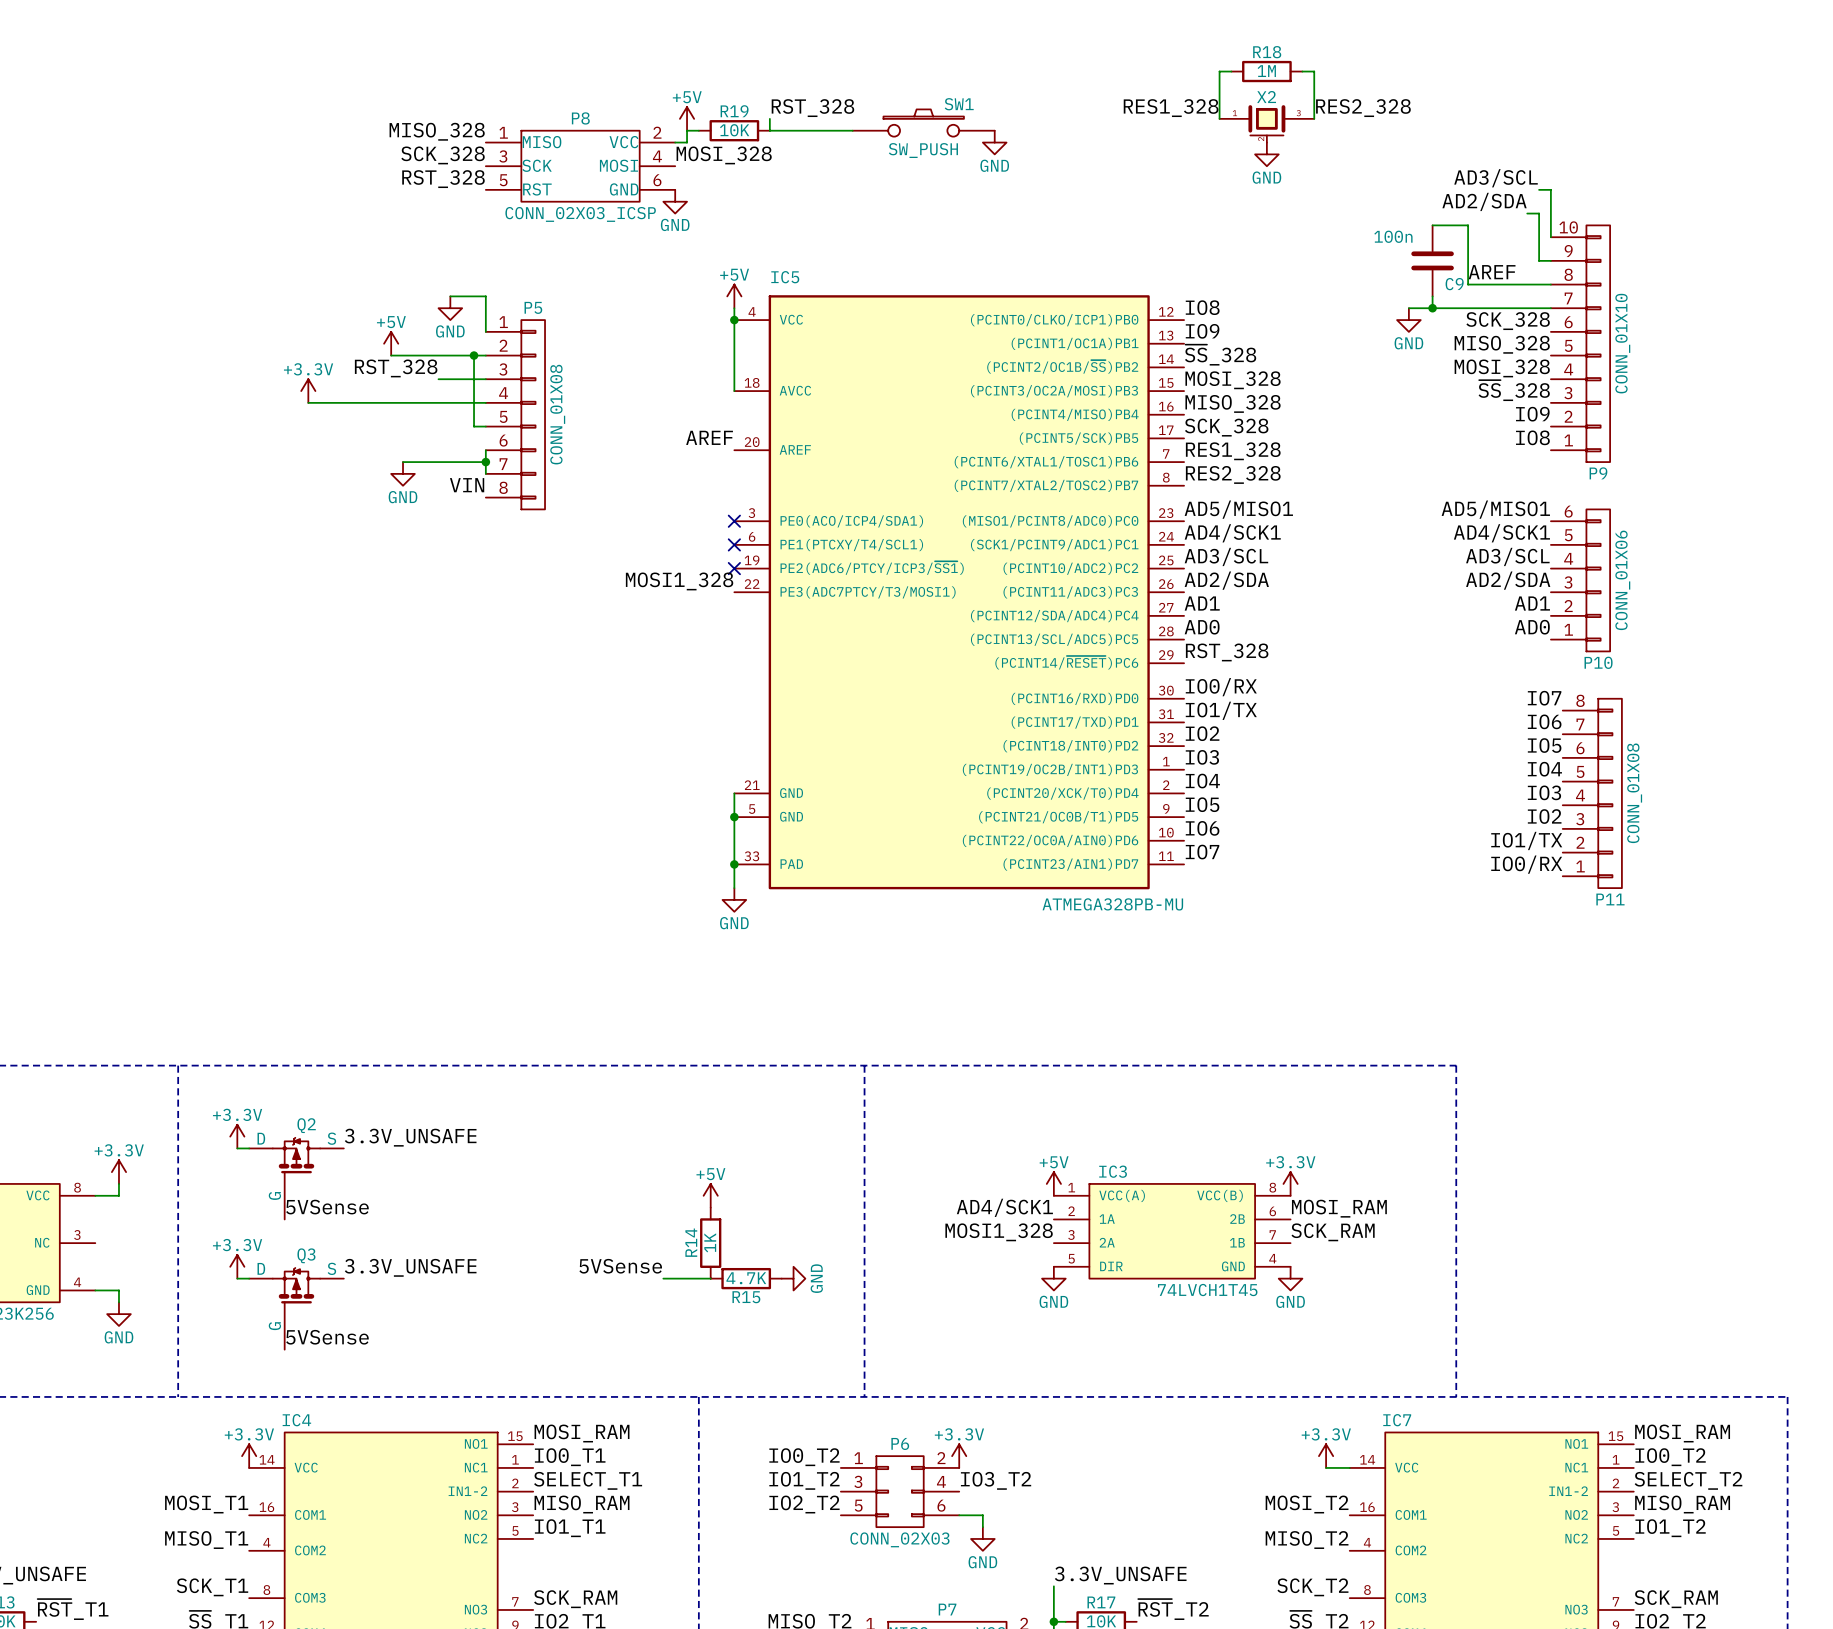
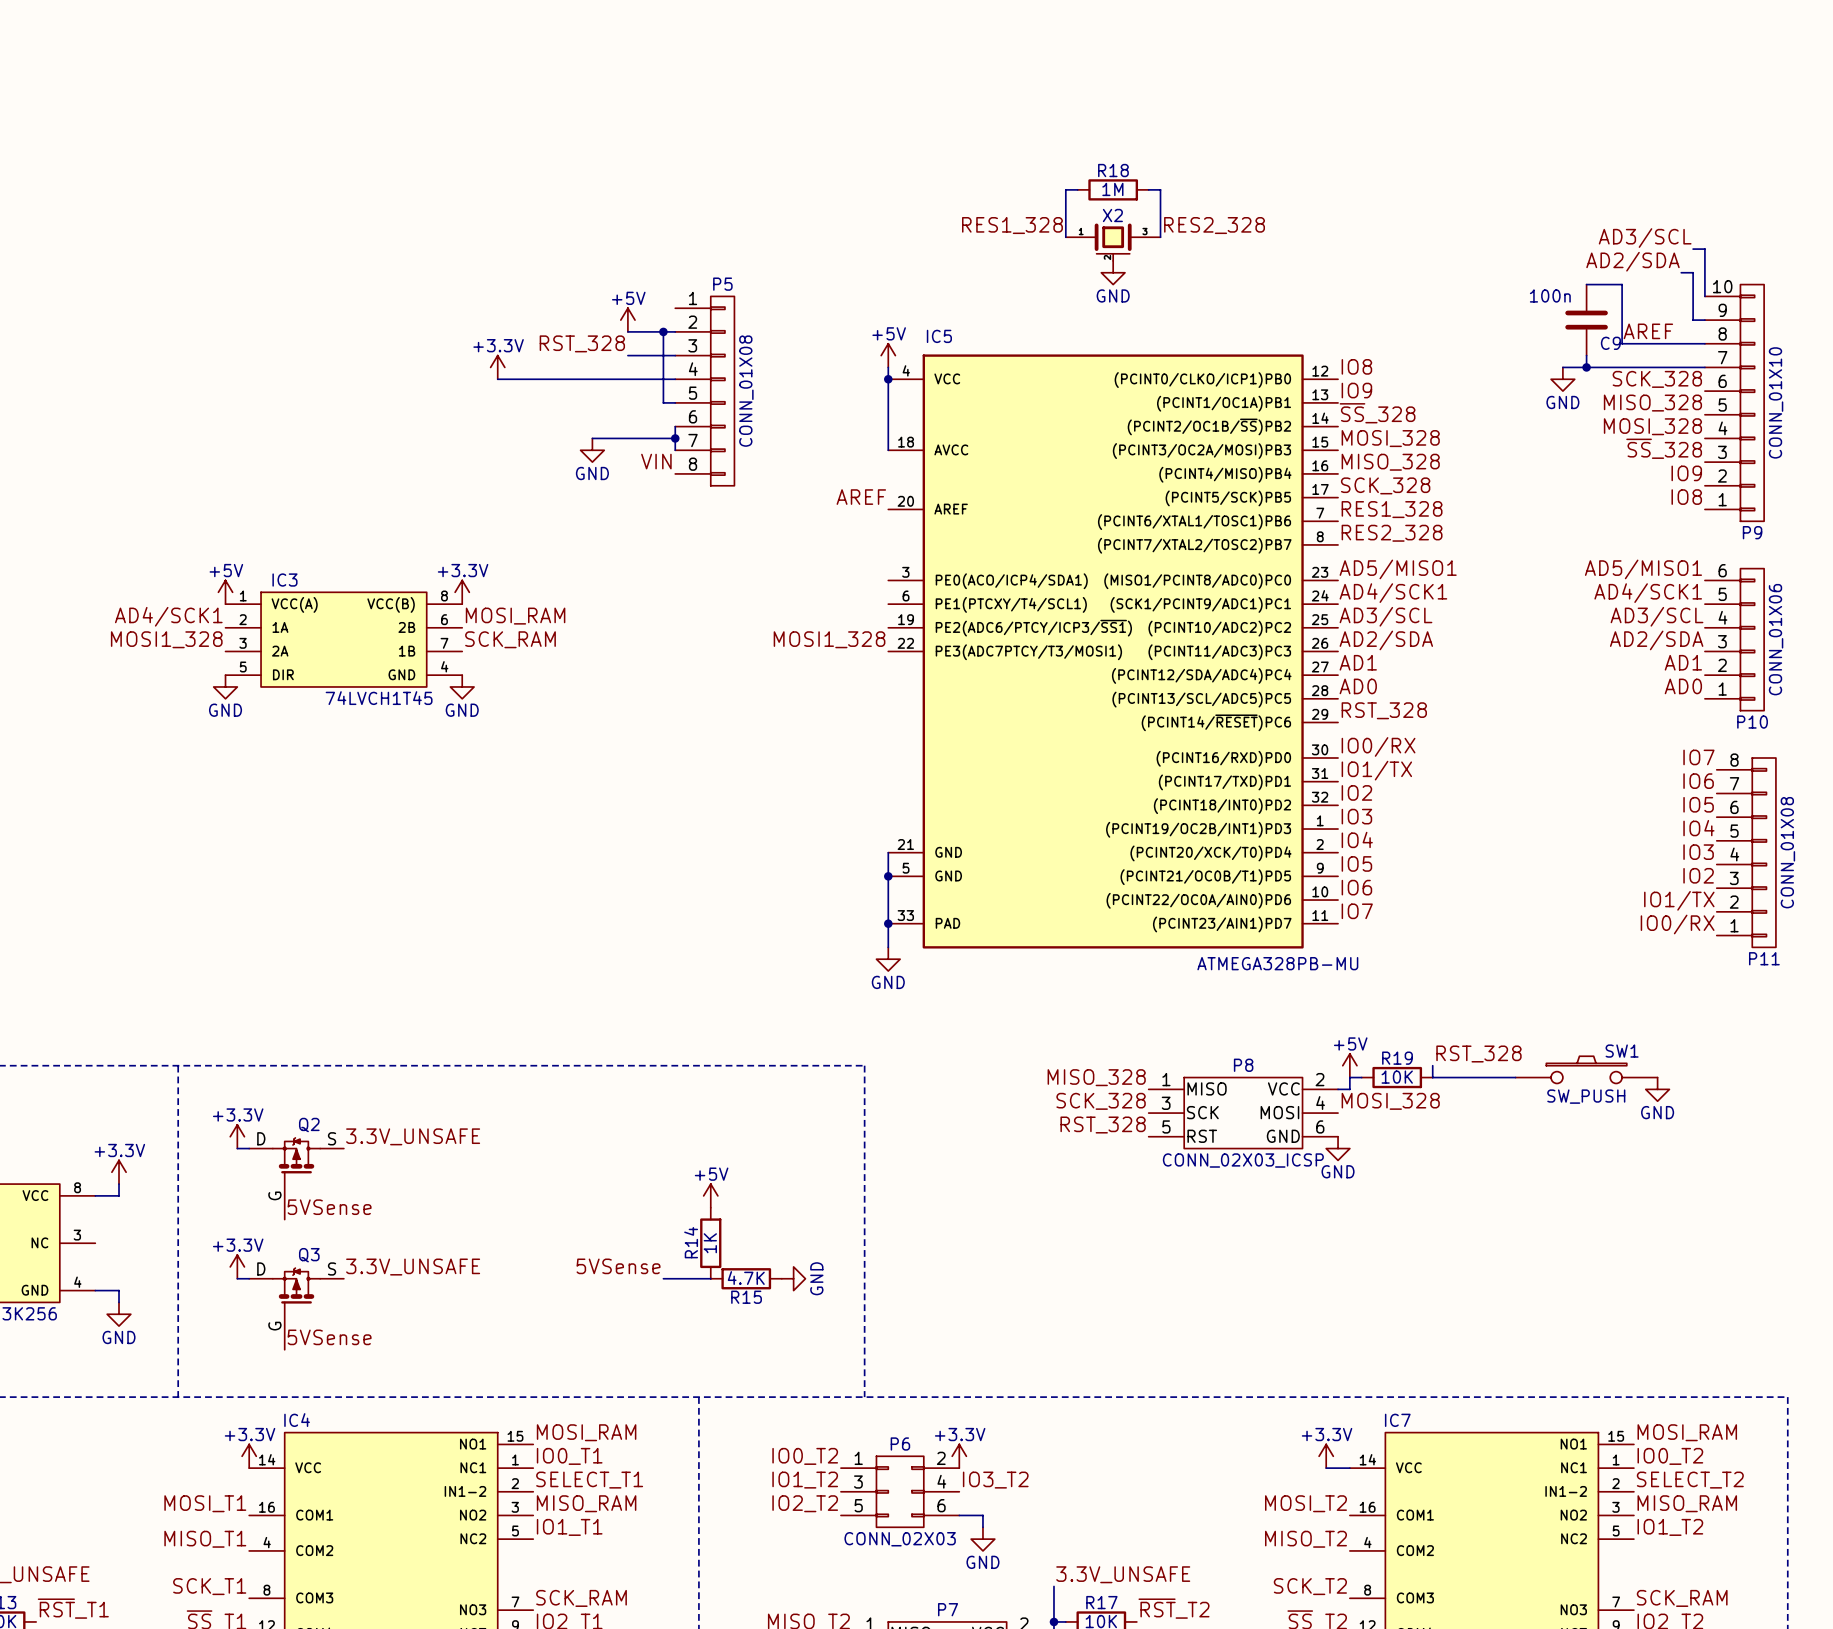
wire: (1231, 71) (1219, 71) (1219, 118) -> (1077, 189) (1065, 189) (1065, 237)
R18 position: (1266, 71) -> (1113, 189)
wire: (1302, 71) (1314, 71) (1314, 118) -> (1148, 189) (1160, 189) (1160, 237)
label: RST_328 (812, 108) -> none
label: RES1_328 (1171, 108) -> none
label: RES2_328 (1363, 108) -> none
power symbol: +5V (687, 118) -> none
wire: (769, 118) (769, 130) (852, 130) -> none
SW1 position: (923, 123) -> (1586, 1069)
X2 position: (1266, 123) -> (1113, 242)
wire: (698, 130) (687, 130) (687, 142) (675, 142) -> none
R19 position: (734, 130) -> (1397, 1077)
label: MISO_328 (437, 131) -> none
power symbol: GND (994, 142) -> none
power symbol: GND (1266, 154) -> none
label: SCK_328 (443, 155) -> none
label: MOSI_328 (724, 155) -> none
P8 position: (580, 166) -> (1243, 1113)
label position: AD3/SCL (1496, 178) -> AD3/SCL (1645, 238)
label: RST_328 (443, 179) -> none
wire: (1539, 189) (1550, 189) (1550, 237) -> (1693, 249) (1704, 249) (1704, 296)
power symbol: GND (675, 201) -> none
label position: AD2/SDA (1484, 201) -> AD2/SDA (1632, 261)
wire: (1527, 213) (1539, 213) (1539, 260) (1550, 260) -> (1681, 272) (1693, 272) (1693, 320) (1704, 320)
wire: (1432, 225) (1468, 225) (1468, 284) (1550, 284) -> (1586, 284) (1622, 284) (1622, 343) (1704, 343)
label: none -> RES1_328 (1012, 225)
label: none -> RES2_328 (1214, 225)
C9 position: (1432, 260) -> (1586, 320)
power symbol: none -> GND (1113, 272)
label position: AREF (1492, 272) -> AREF (1648, 331)
wire: (450, 296) (485, 296) (485, 331) -> none
power symbol: +5V (734, 296) -> none
label: IO8 (1202, 307) -> none
power symbol: GND (450, 308) -> none
wire: (1408, 308) (1550, 308) -> (1562, 367) (1704, 367)
junction: (1432, 308) -> none
power symbol: none -> +5V (627, 320)
junction: (734, 320) -> none
power symbol: GND (1408, 320) -> none
label: SCK_328 (1508, 321) -> none
wire: none -> (627, 331) (675, 331)
junction: none -> (663, 331)
label: IO9 (1202, 331) -> none
power symbol: +5V (391, 343) -> none
P9 position: (1580, 343) -> (1734, 402)
label: none -> RST_328 (582, 343)
label: MISO_328 (1502, 344) -> none
wire: (391, 355) (485, 355) -> none
wire: (474, 355) (474, 426) (485, 426) -> (663, 331) (663, 402) (675, 402)
junction: (474, 355) -> none
power symbol: none -> +5V (888, 355)
label: ~{SS}_328 (1220, 355) -> none
label: none -> IO8 (1356, 366)
power symbol: none -> +3.3V (497, 367)
junction: none -> (1586, 367)
label: RST_328 (396, 368) -> none
label: MOSI_328 (1502, 368) -> none
wire: (438, 379) (485, 379) -> (627, 355) (675, 355)
junction: none -> (888, 379)
power symbol: none -> GND (1562, 379)
label: MOSI_328 (1233, 380) -> none
label: none -> SCK_328 (1657, 379)
label: none -> IO9 (1356, 390)
label position: ~{SS}_328 (1514, 390) -> ~{SS}_328 (1377, 413)
power symbol: +3.3V (308, 391) -> none
wire: (308, 402) (485, 402) -> (497, 379) (675, 379)
label: MISO_328 (1233, 403) -> none
label: none -> MISO_328 (1652, 403)
P5 position: (515, 414) -> (704, 391)
label: IO9 (1532, 414) -> none
label: SCK_328 (1226, 427) -> none
label: none -> MOSI_328 (1652, 426)
label position: AREF (709, 437) -> AREF (861, 497)
label: IO8 (1532, 437) -> none
junction: none -> (675, 438)
label: none -> MOSI_328 (1390, 438)
label: none -> ~{SS}_328 (1664, 448)
wire: (485, 450) (485, 473) -> (675, 426) (675, 450)
power symbol: none -> GND (592, 450)
label: RES1_328 (1233, 451) -> none
wire: (403, 462) (485, 462) -> (592, 438) (675, 438)
junction: (485, 462) -> none
label: none -> MISO_328 (1390, 462)
power symbol: GND (403, 473) -> none
label: none -> IO9 (1686, 473)
label: RES2_328 (1233, 474) -> none
label position: VIN (467, 485) -> VIN (656, 461)
label: none -> SCK_328 (1385, 485)
label: none -> IO8 (1686, 497)
label: AD5/MISO1 (1238, 509) -> none
label: AD5/MISO1 (1495, 509) -> none
label: none -> RES1_328 (1392, 509)
no-connect mark: (734, 521) -> none
label: AD4/SCK1 (1232, 533) -> none
label: AD4/SCK1 (1501, 533) -> none
label: none -> RES2_328 (1392, 533)
no-connect mark: (734, 544) -> none
label: AD3/SCL (1226, 556) -> none
label: AD3/SCL (1507, 556) -> none
no-connect mark: (734, 568) -> none
label: none -> AD5/MISO1 (1398, 569)
label: none -> AD5/MISO1 (1643, 569)
label: AD2/SDA (1226, 580) -> none
label: AD2/SDA (1508, 580) -> none
P10 position: (1580, 580) -> (1734, 639)
label position: MOSI1_328 (679, 581) -> MOSI1_328 (829, 639)
power symbol: none -> +5V (225, 592)
power symbol: none -> +3.3V (462, 592)
IC5 position: (959, 592) -> (1113, 651)
label: none -> AD4/SCK1 (1393, 593)
label: none -> AD4/SCK1 (1648, 593)
label: AD1 (1202, 603) -> none
label: AD1 (1532, 603) -> none
label: none -> AD4/SCK1 (168, 616)
label: none -> MOSI_RAM (515, 616)
label: none -> AD3/SCL (1385, 616)
label: none -> AD3/SCL (1656, 616)
label: AD0 (1202, 627) -> none
label: AD0 (1532, 627) -> none
label: none -> AD2/SDA (1386, 640)
label: none -> AD2/SDA (1656, 640)
label: none -> MOSI1_328 (166, 639)
label: none -> SCK_RAM (510, 639)
label position: RST_328 (1227, 652) -> RST_328 (1384, 710)
label: none -> AD1 (1358, 662)
label: none -> AD1 (1683, 662)
power symbol: none -> GND (225, 686)
power symbol: none -> GND (462, 686)
label: none -> AD0 (1358, 686)
label: none -> AD0 (1683, 686)
label: IO0/RX (1221, 687) -> none
label: IO7 (1544, 698) -> none
label: IO1/TX (1221, 710) -> none
label: IO6 (1544, 721) -> none
label: IO2 (1202, 733) -> none
label: IO5 (1544, 745) -> none
label: none -> IO0/RX (1378, 746)
label: IO3 (1202, 757) -> none
label: none -> IO7 (1698, 757)
label: none -> IO1/TX (1376, 770)
label: IO4 (1544, 769) -> none
label: IO4 (1202, 781) -> none
label: none -> IO6 (1698, 781)
label: none -> IO2 (1356, 792)
label: IO3 (1544, 792) -> none
wire: (734, 793) (734, 888) -> (888, 852) (888, 947)
P11 position: (1592, 793) -> (1746, 852)
label: IO5 (1202, 804) -> none
label: none -> IO5 (1698, 804)
label: none -> IO3 (1356, 816)
label: IO2 (1544, 816) -> none
junction: (734, 817) -> none
label: IO6 (1202, 828) -> none
label: none -> IO4 (1698, 828)
label: none -> IO4 (1357, 839)
label: IO1/TX (1526, 840) -> none
label: IO7 (1202, 852) -> none
label: none -> IO3 (1698, 852)
label: none -> IO5 (1356, 863)
junction: (734, 864) -> none
label: IO0/RX (1526, 864) -> none
label: none -> IO2 (1698, 875)
junction: none -> (888, 876)
label: none -> IO6 (1356, 887)
power symbol position: GND (734, 899) -> GND (888, 959)
label: none -> IO1/TX (1679, 900)
label: none -> IO7 (1357, 911)
junction: none -> (888, 923)
label: none -> IO0/RX (1677, 924)
label: none -> RST_328 (1478, 1054)
line: (864, 1065) (1456, 1065) (1456, 1396) -> none
power symbol: none -> +5V (1349, 1065)
wire: none -> (1432, 1065) (1432, 1077) (1515, 1077)
wire: none -> (1361, 1077) (1349, 1077) (1349, 1089) (1338, 1089)
label: none -> MISO_328 (1096, 1077)
power symbol: none -> GND (1657, 1089)
label: none -> SCK_328 (1101, 1101)
label: none -> MOSI_328 (1390, 1101)
label: none -> RST_328 (1103, 1125)
power symbol: +5V (1053, 1183) -> none
power symbol: +3.3V (1290, 1183) -> none
label: AD4/SCK1 (1004, 1207) -> none
label: MOSI_RAM (1339, 1208) -> none
IC3 position: (1172, 1231) -> (343, 639)
label: MOSI1_328 (999, 1232) -> none
label: SCK_RAM (1333, 1232) -> none
power symbol: GND (1053, 1278) -> none
power symbol position: GND (1290, 1278) -> GND (1338, 1148)

